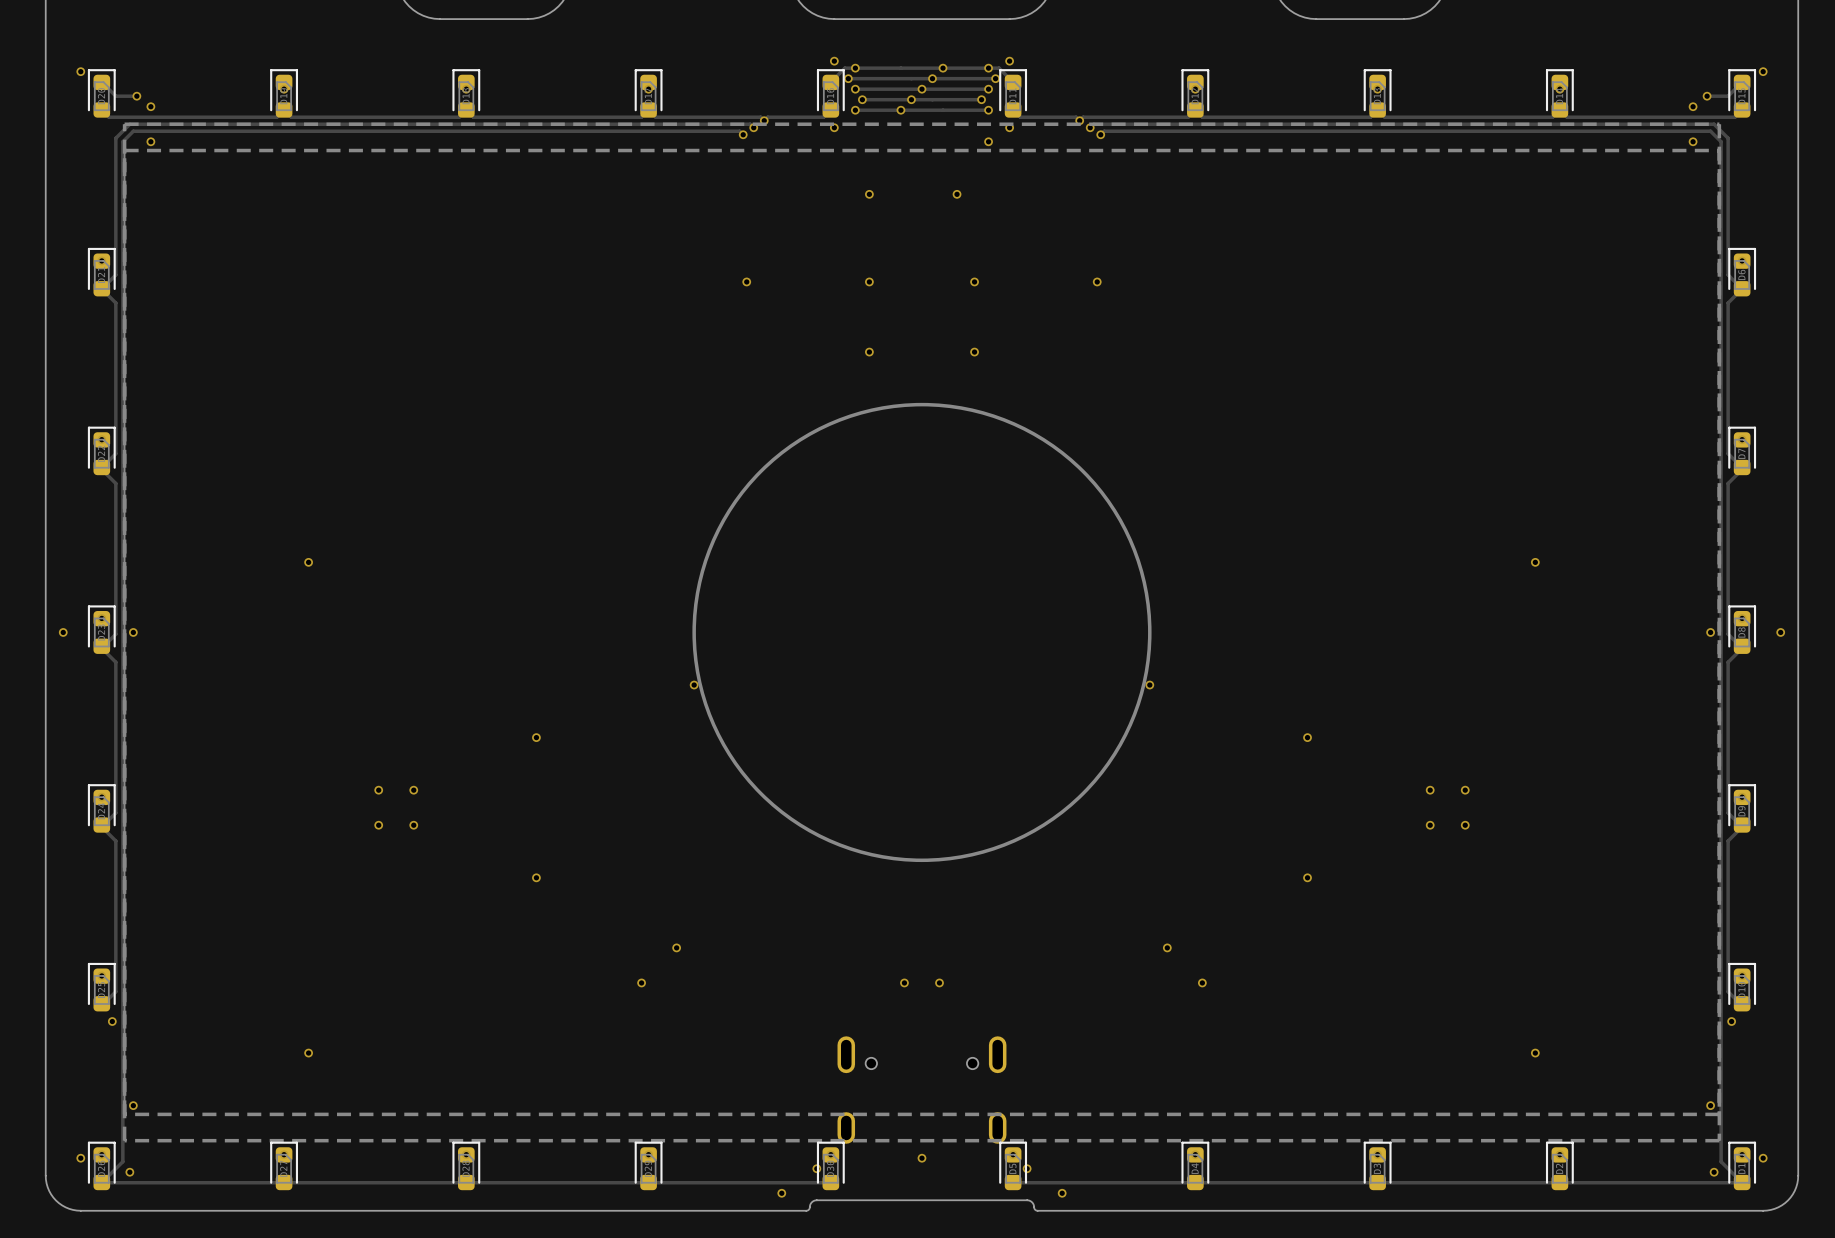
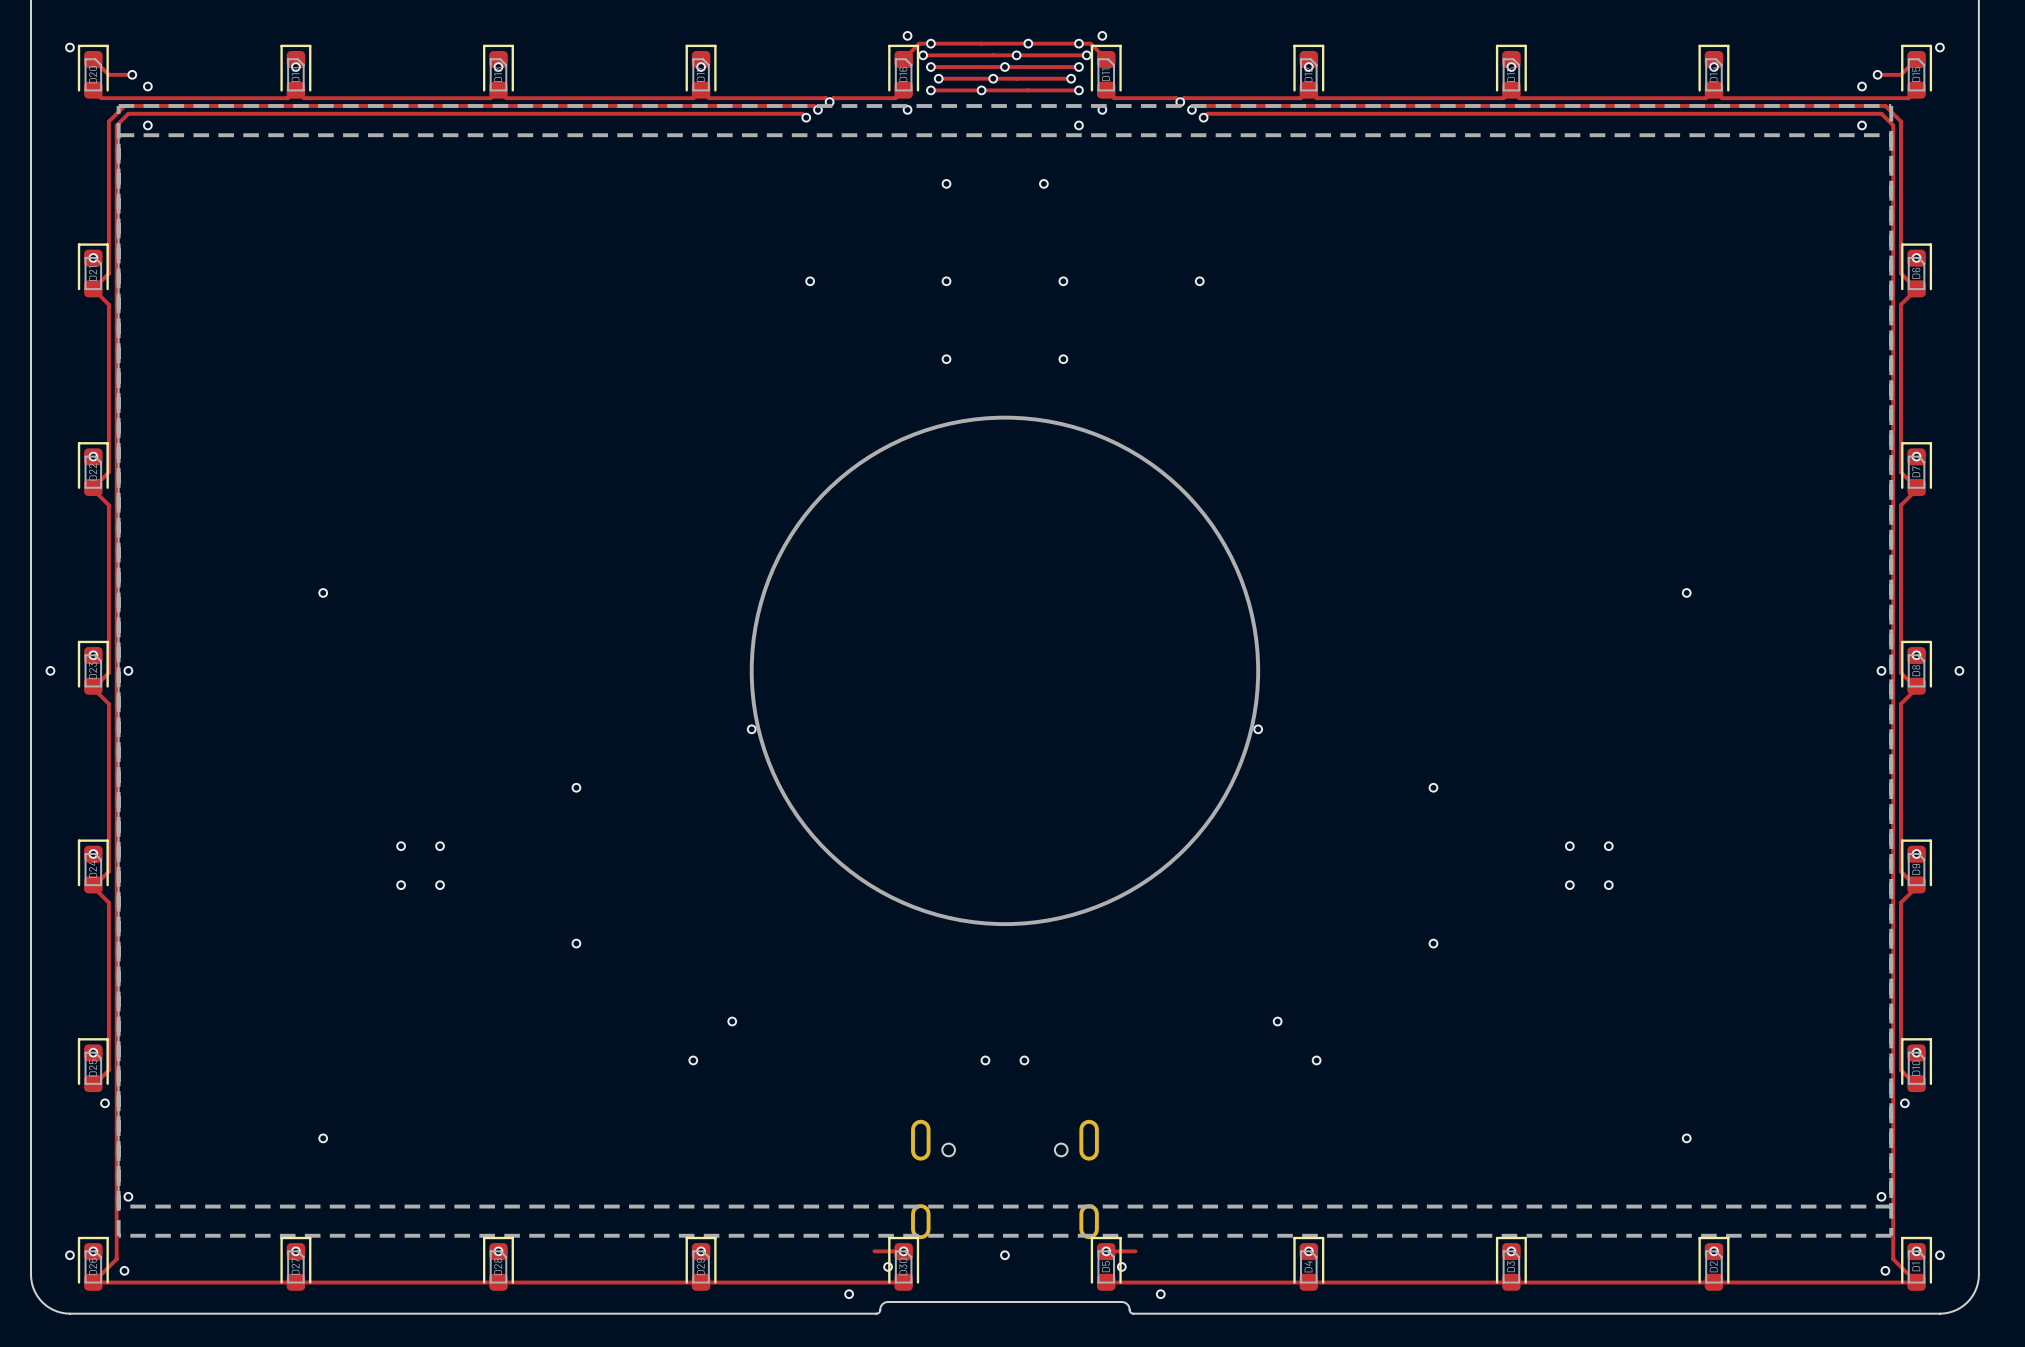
track: none -> (874, 1251) (903, 1251)
track: none -> (1106, 1251) (1135, 1251)

